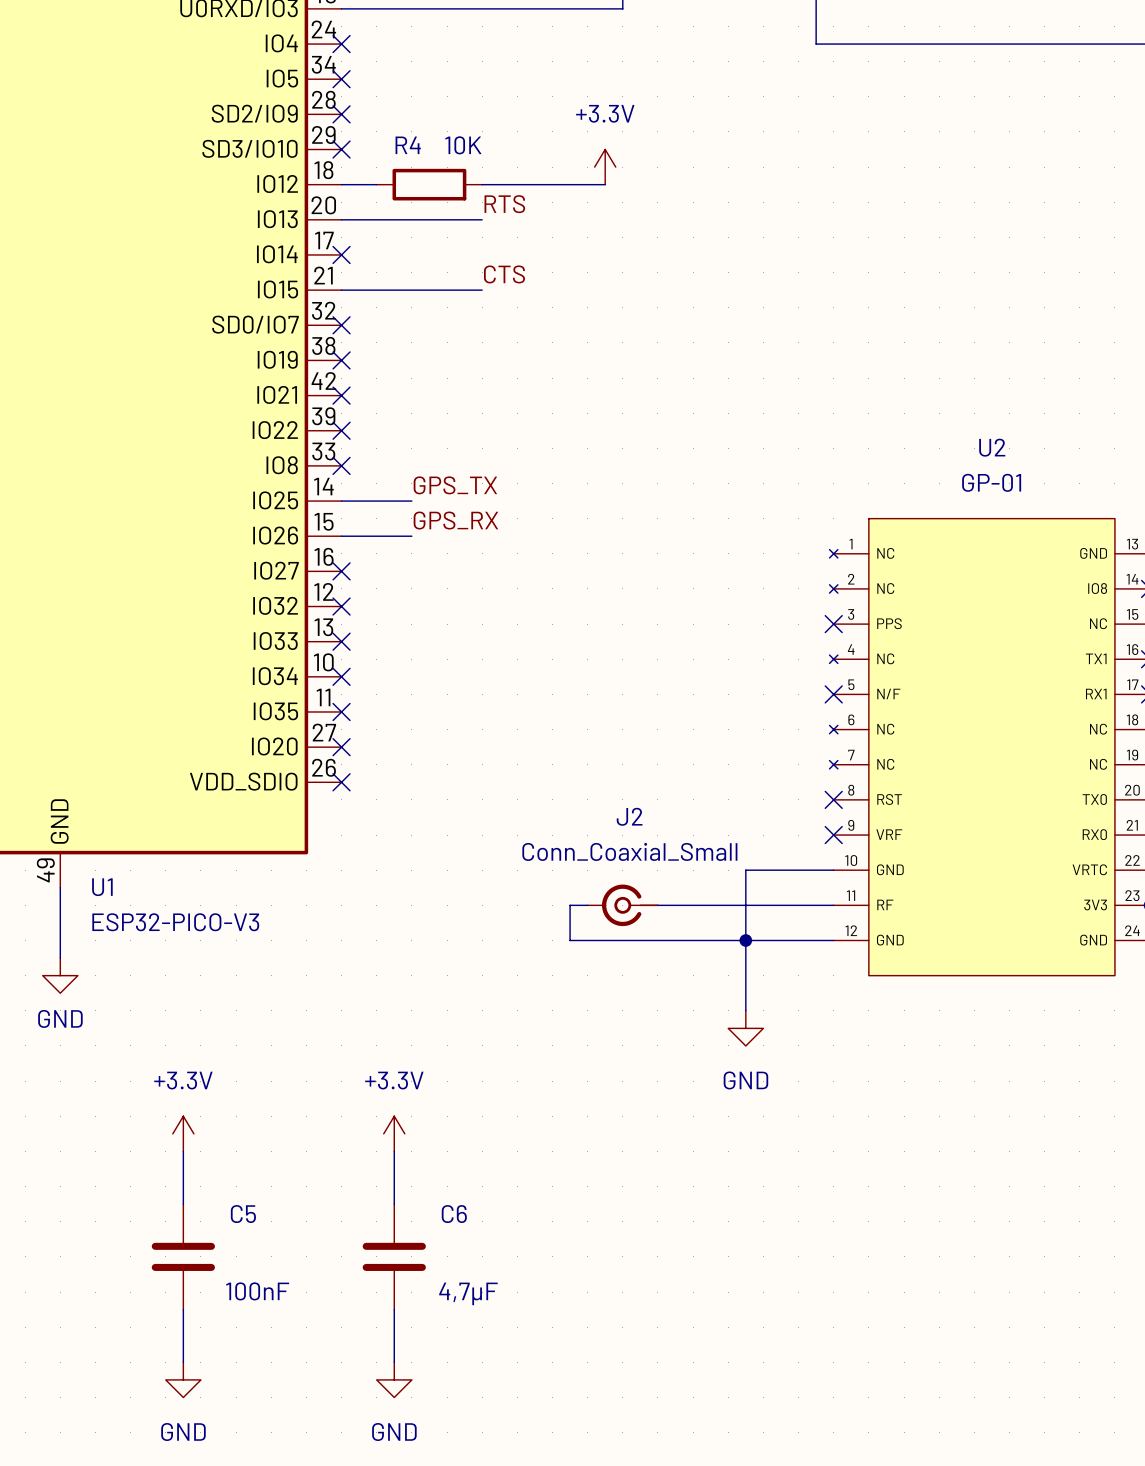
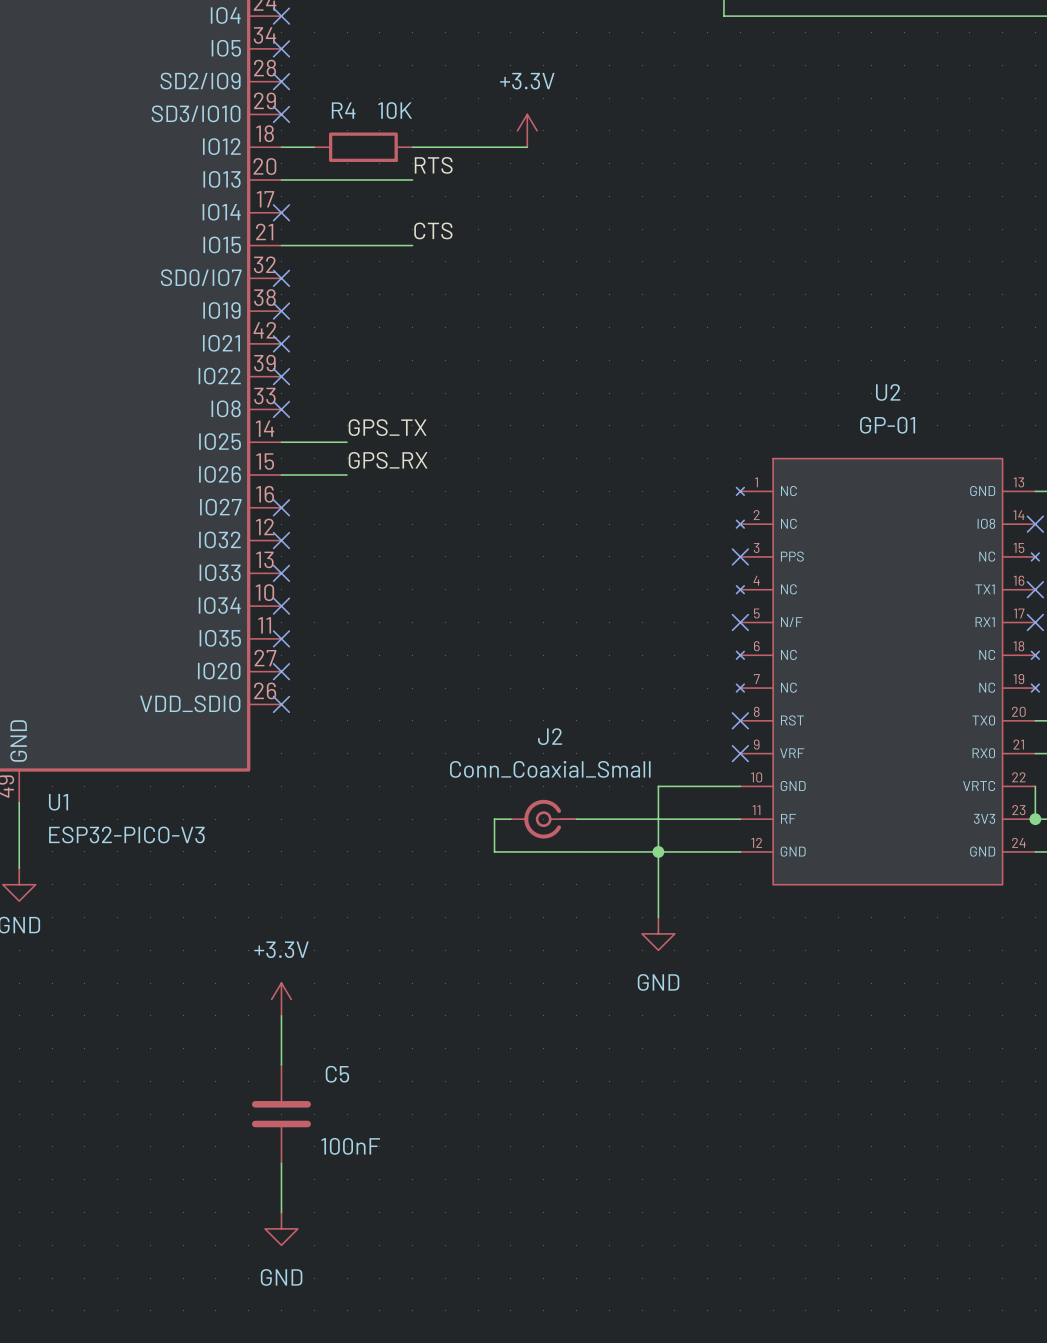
power symbol: +3.3V (183, 1133) -> none
power symbol position: +3.3V (394, 1133) -> +3.3V (281, 999)
wire: (183, 1151) (183, 1204) -> none
wire: (394, 1151) (394, 1204) -> (281, 1015) (281, 1065)
C5 position: (183, 1256) -> (281, 1114)
C6: 4,7µF (394, 1256) -> none
wire: (183, 1309) (183, 1362) -> none
wire: (394, 1309) (394, 1362) -> (281, 1163) (281, 1212)
power symbol: GND (183, 1379) -> none
power symbol position: GND (394, 1379) -> GND (281, 1228)

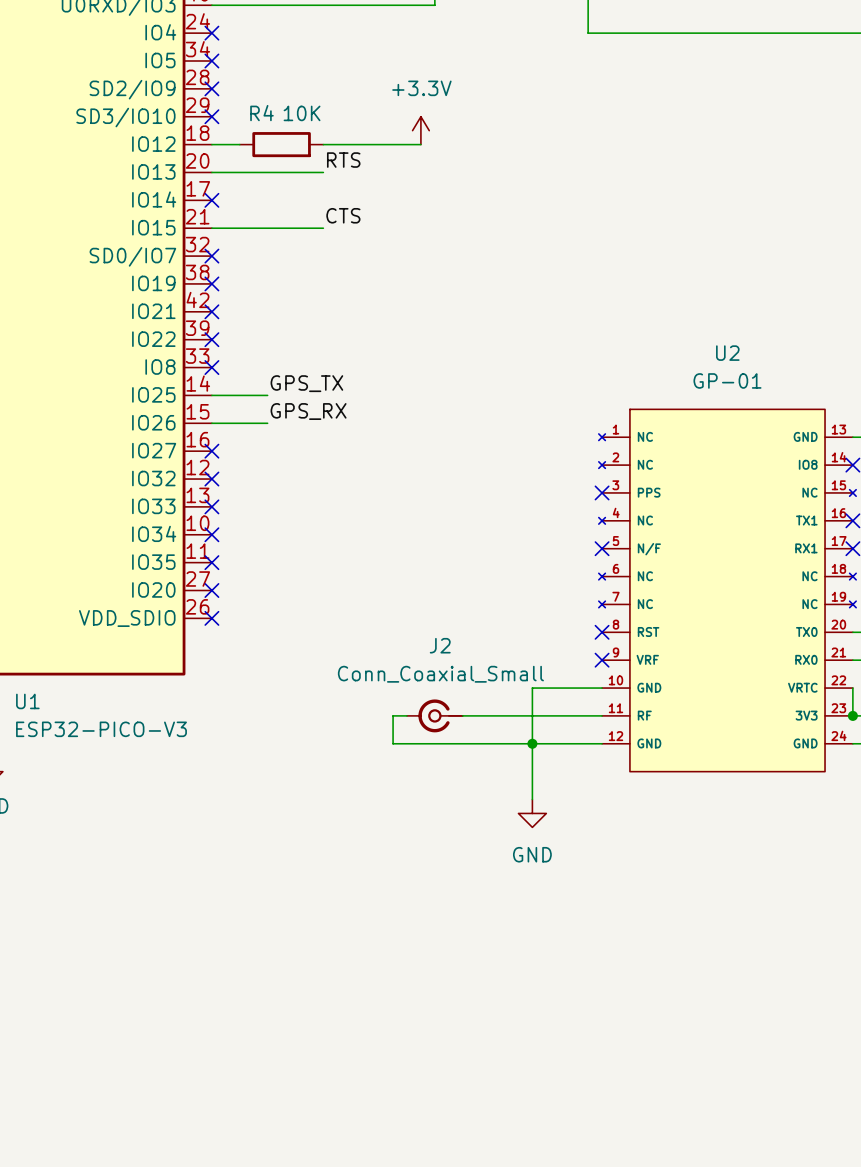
power symbol: +3.3V (281, 999) -> none
wire: (281, 1015) (281, 1065) -> none
C5: 100nF (281, 1114) -> none
wire: (281, 1163) (281, 1212) -> none
power symbol: GND (281, 1228) -> none

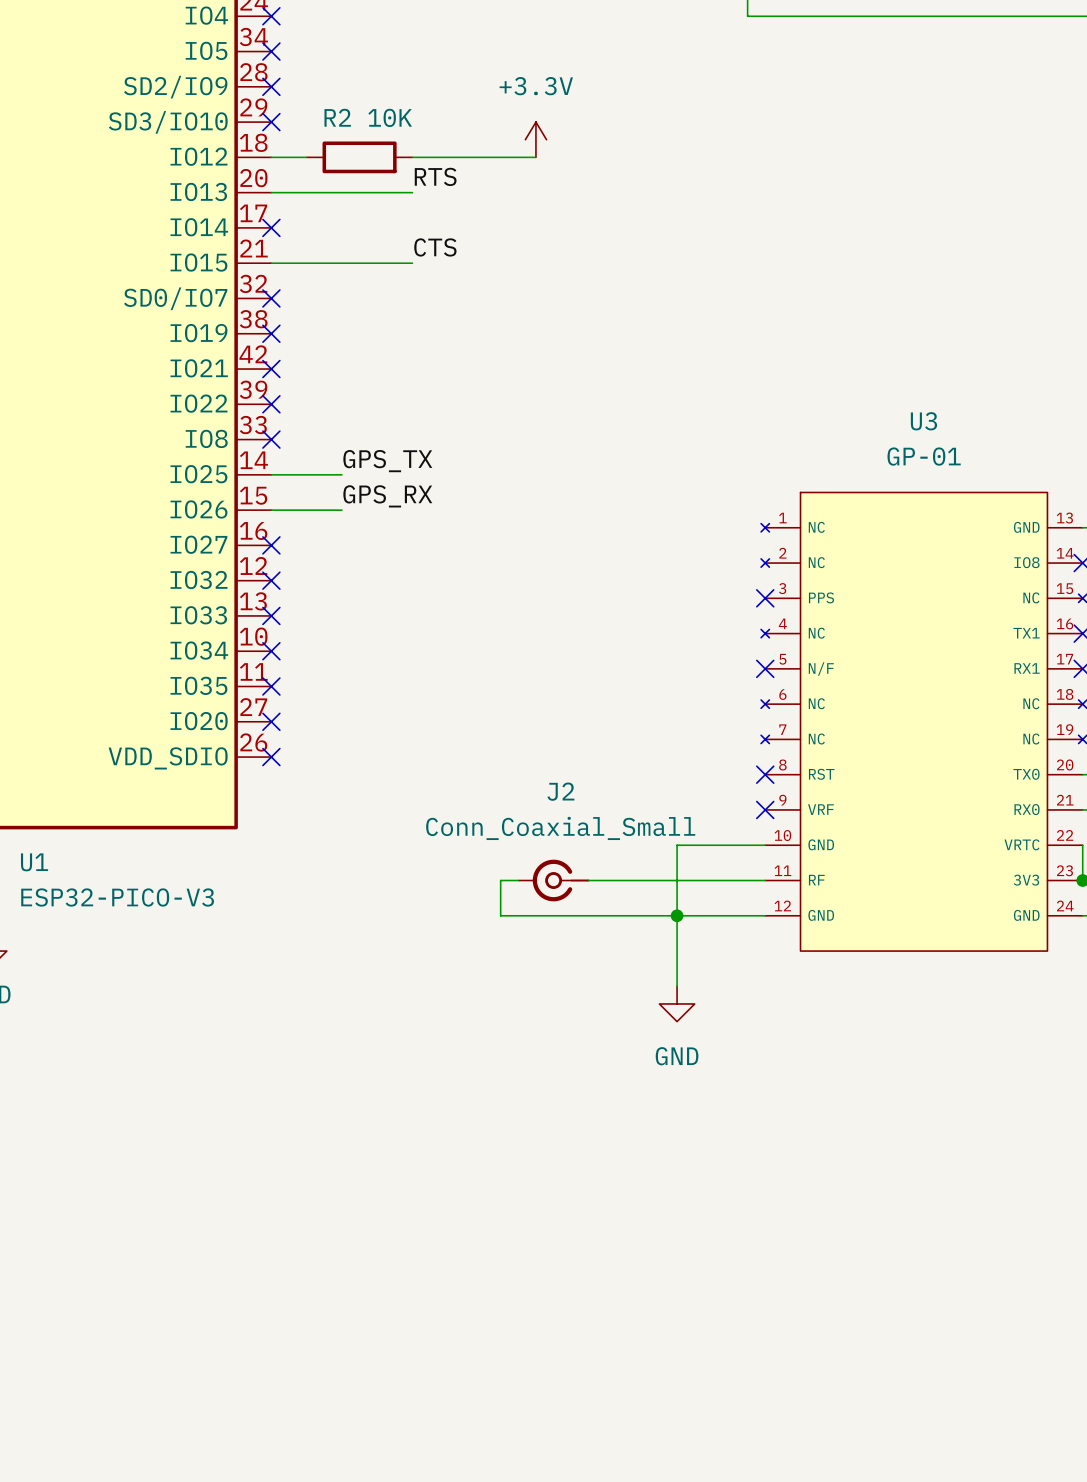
R4 name: R4 (261, 113) -> R2 (337, 117)
U2 name: U2 (727, 353) -> U3 (923, 421)

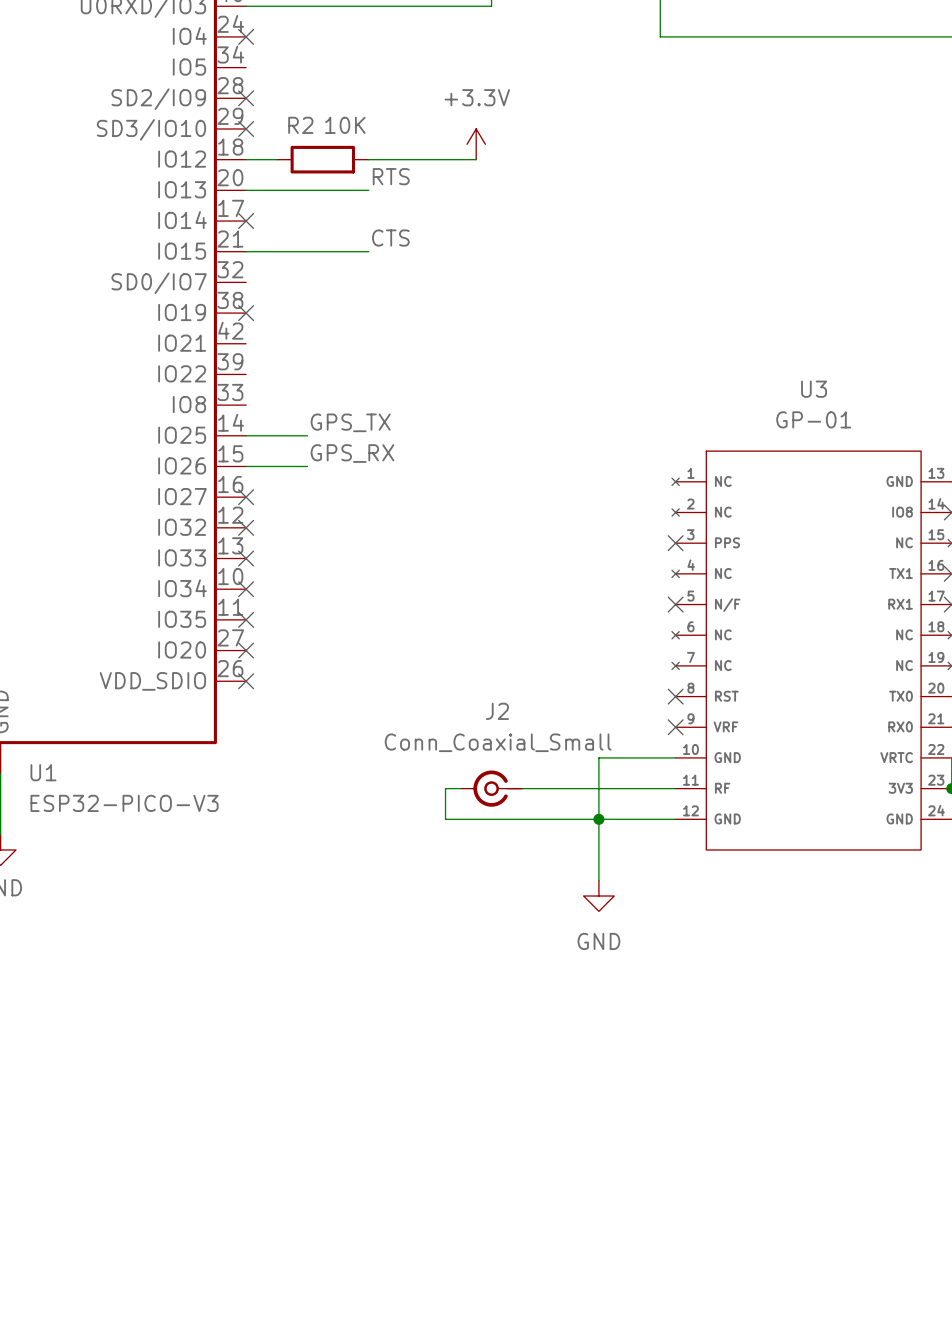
no-connect mark: (271, 51) -> none
no-connect mark: (271, 298) -> none
no-connect mark: (271, 369) -> none
no-connect mark: (271, 404) -> none
no-connect mark: (271, 439) -> none

